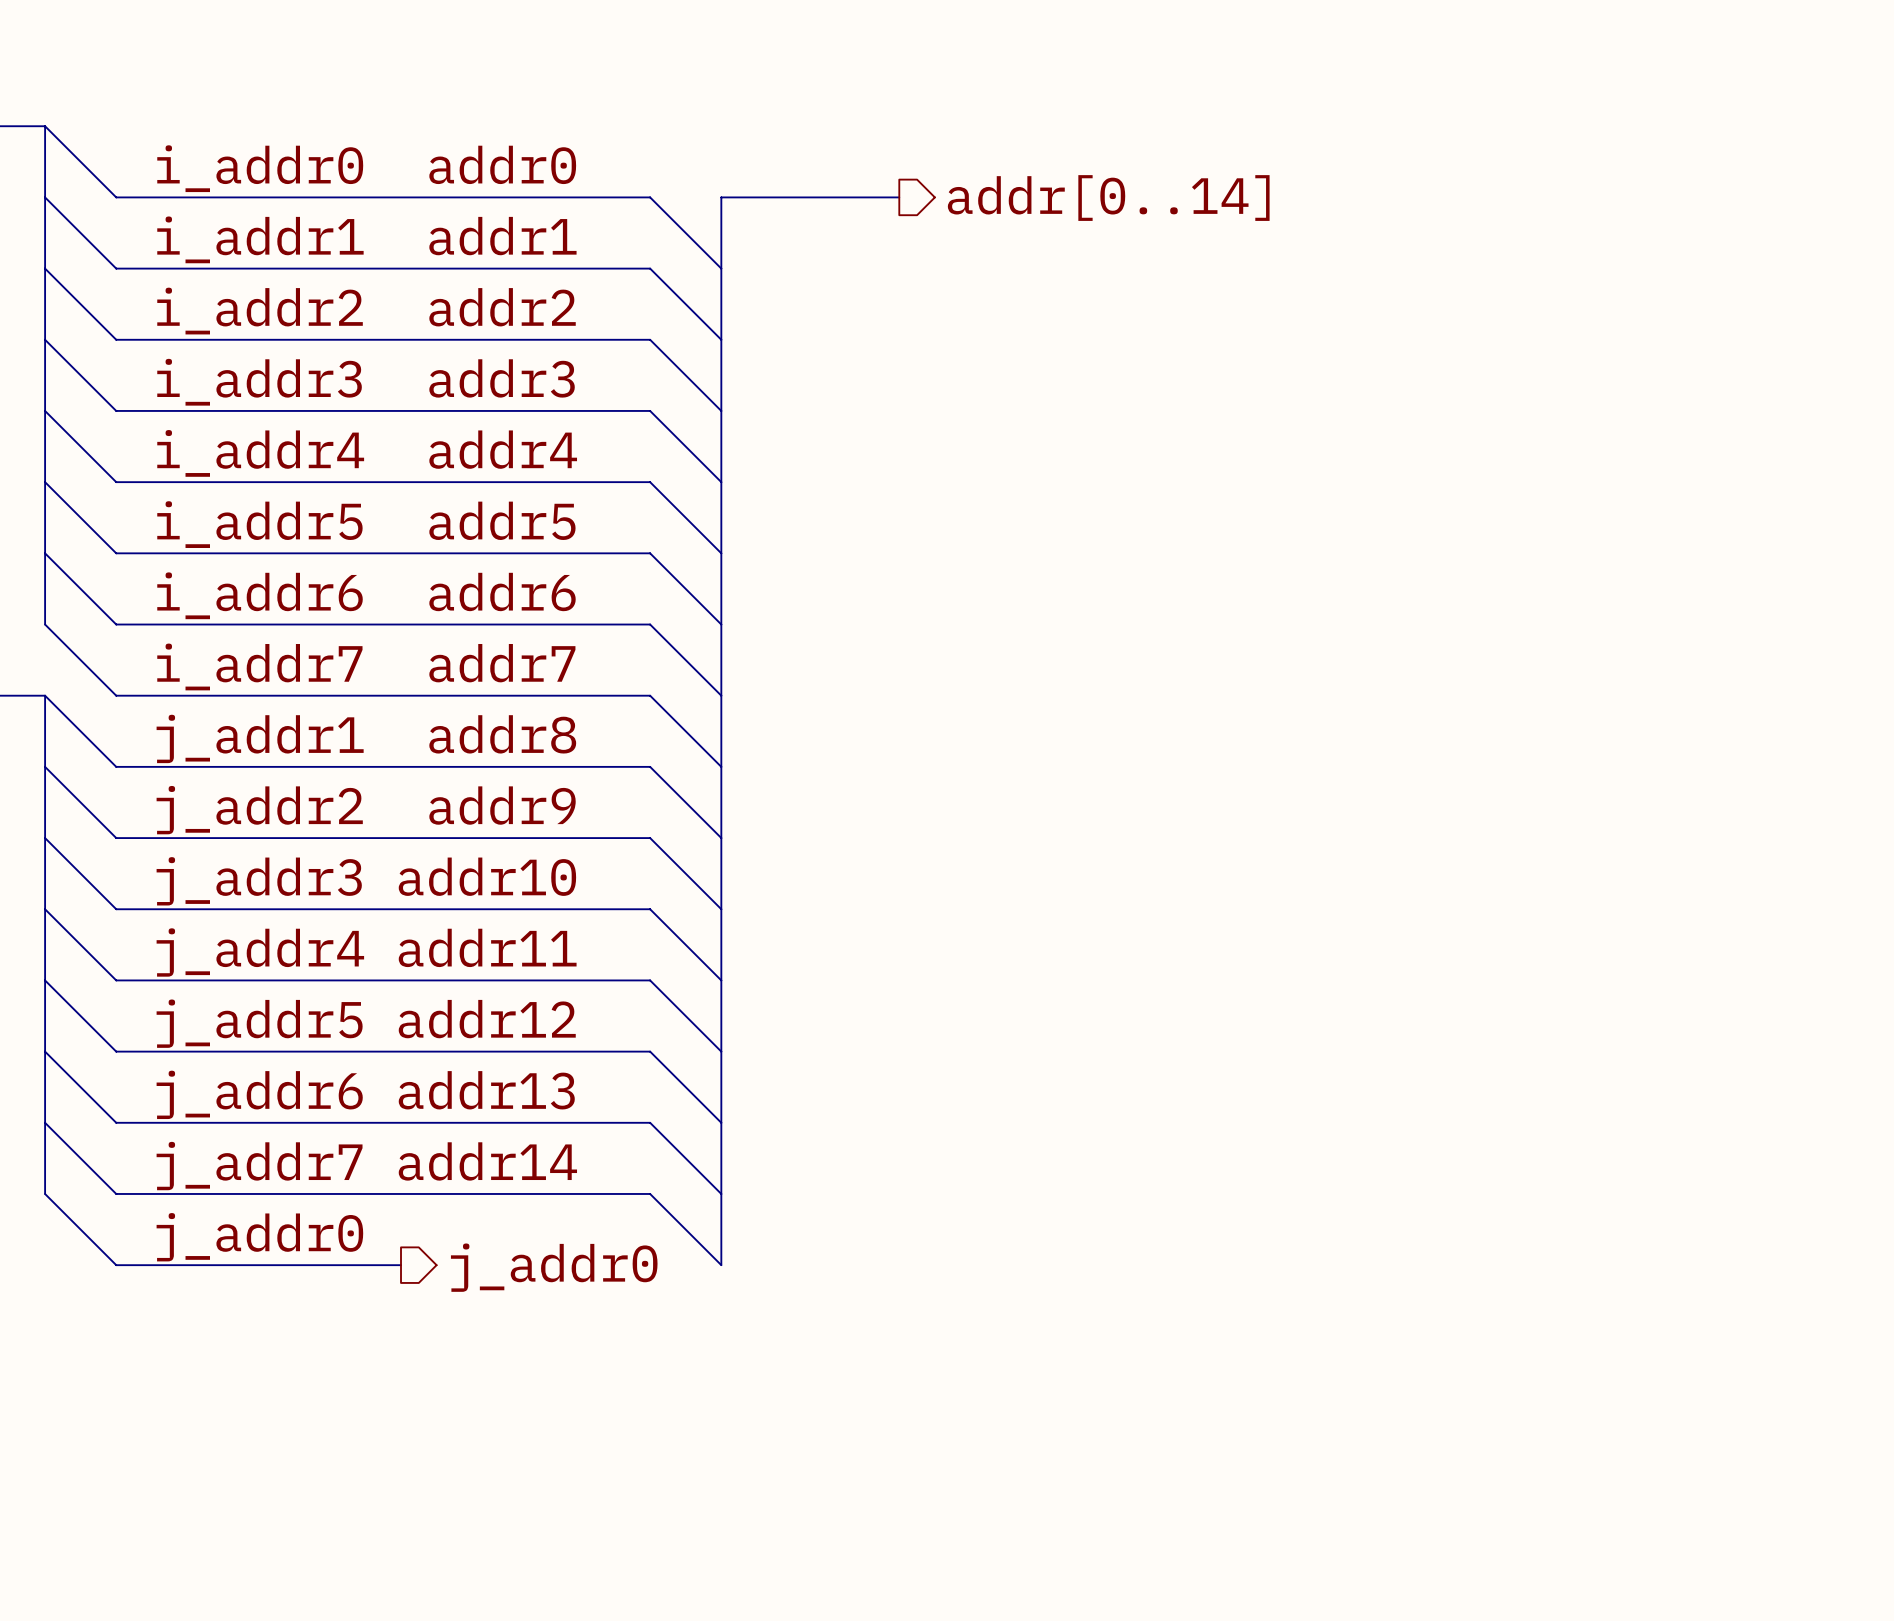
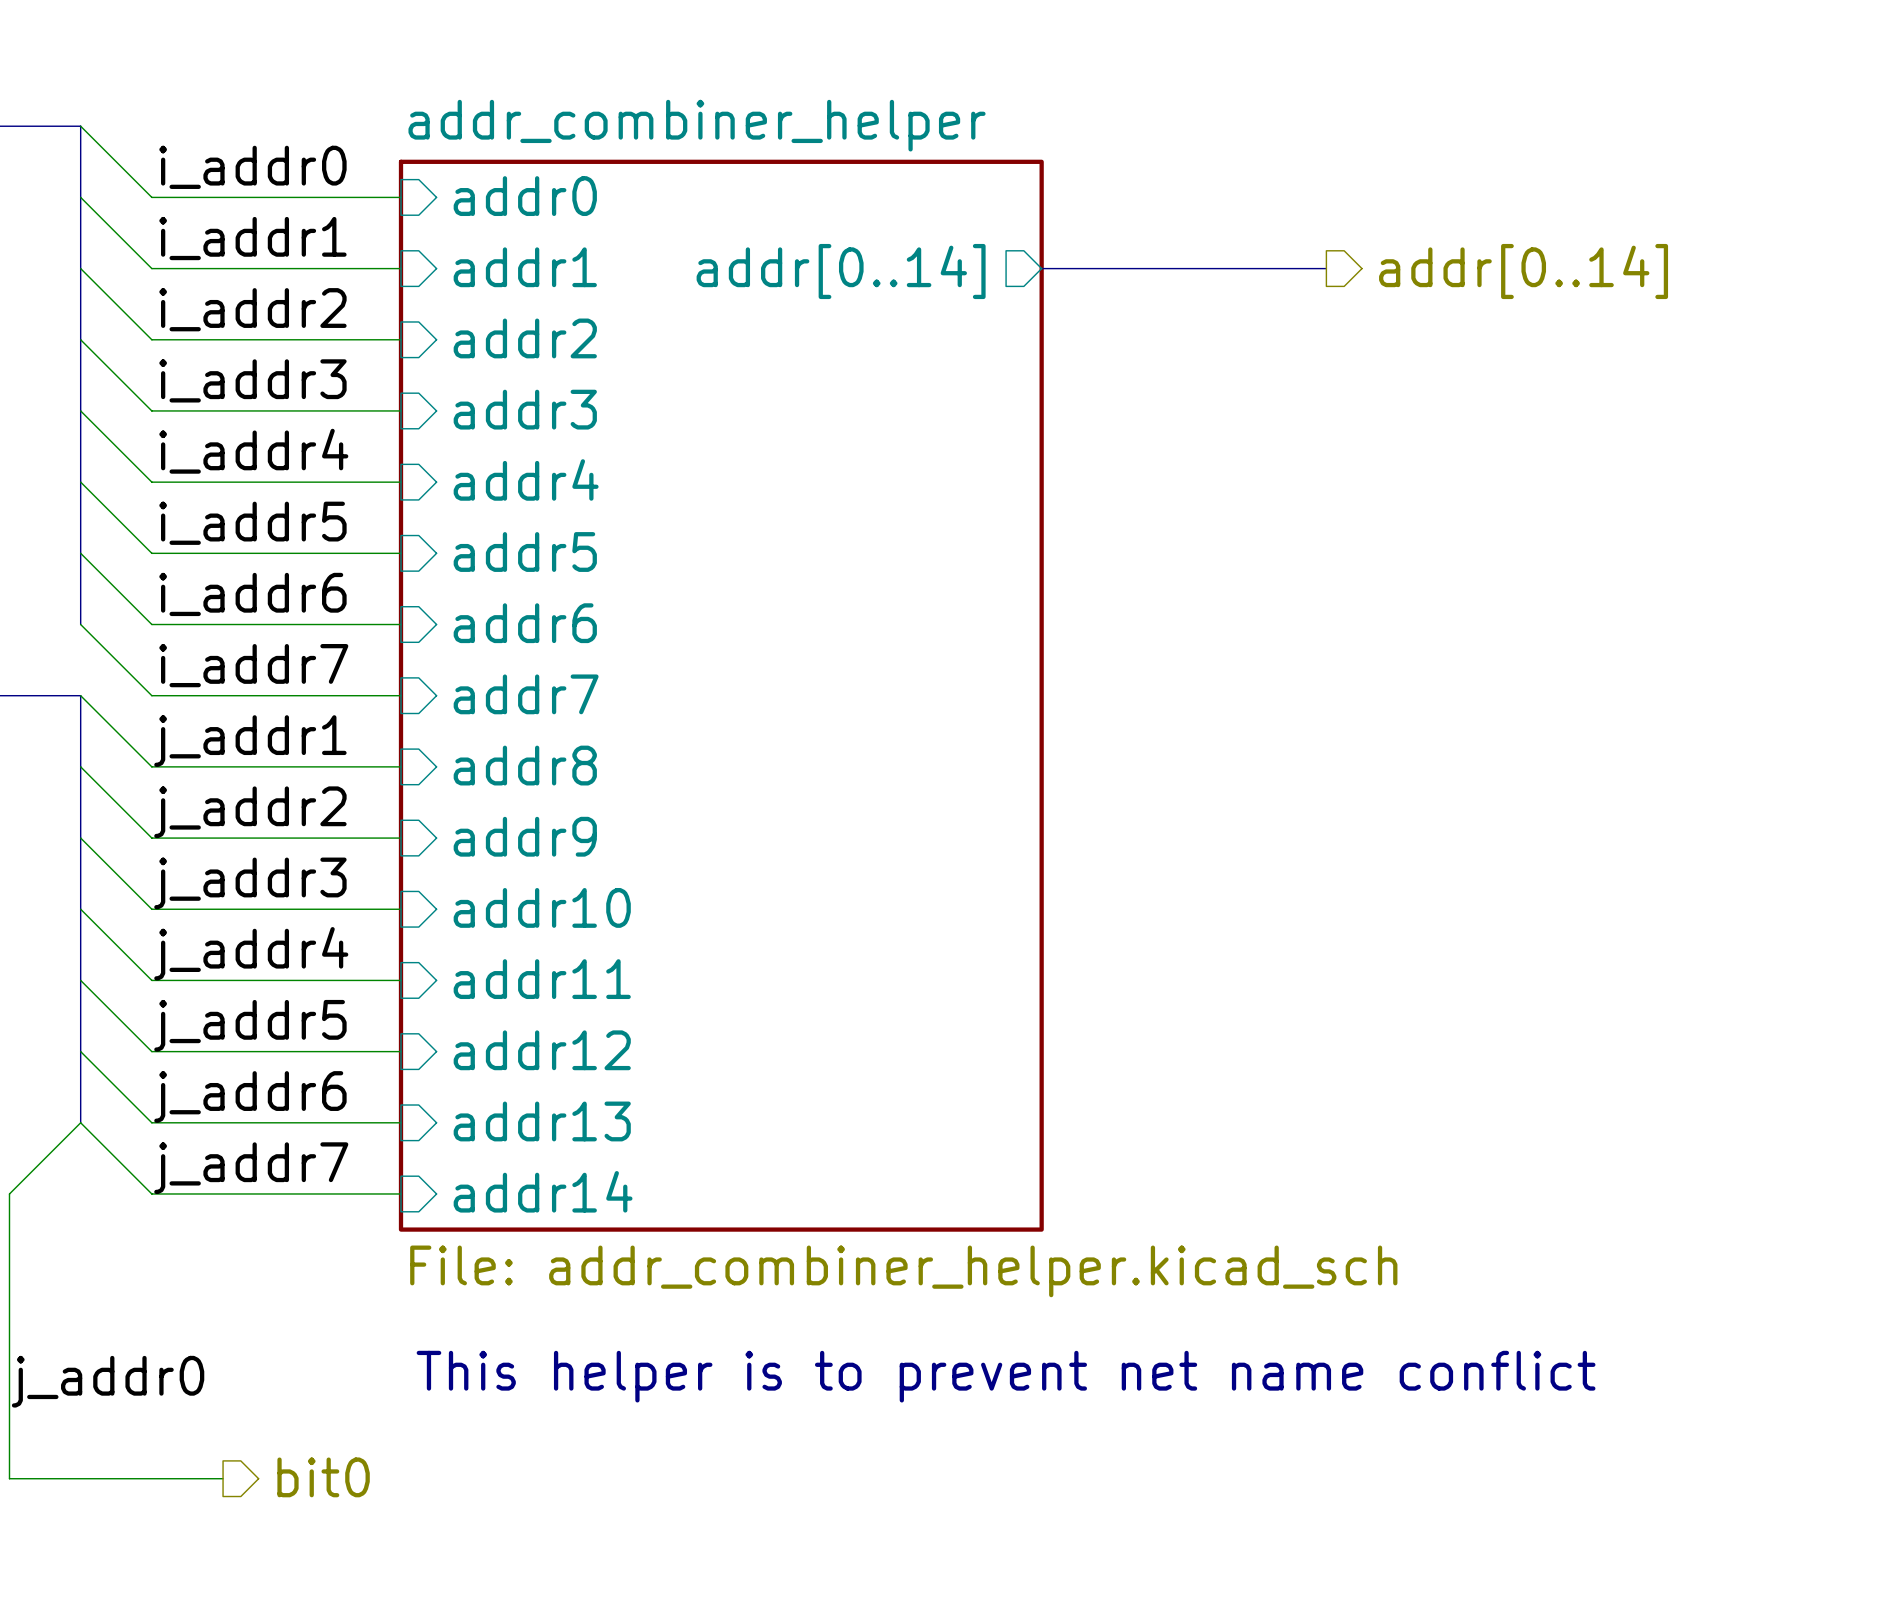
wire: (45, 126) (116, 197) (151, 197) -> (80, 126) (151, 197)
bus: (45, 126) (45, 624) -> (45, 126) (80, 126) (80, 624)
label: addr0 (502, 164) -> none
sheet pin: none -> addr0 (525, 196)
wire: (45, 197) (116, 268) (151, 268) -> (80, 197) (151, 268)
wire: (401, 197) (650, 197) (721, 268) -> none
bus: (899, 197) (721, 197) (721, 1265) -> none
hierarchical label position: addr[0..14] (1108, 198) -> addr[0..14] (1523, 271)
label: addr1 (502, 236) -> none
sheet pin: none -> addr1 (525, 267)
wire: (45, 268) (116, 339) (151, 339) -> (80, 268) (151, 339)
wire: (401, 268) (650, 268) (721, 339) -> none
bus: none -> (1041, 268) (1326, 268)
sheet pin: none -> addr[0..14] (841, 271)
label: addr2 (502, 307) -> none
sheet pin: none -> addr2 (525, 338)
wire: (45, 339) (116, 410) (151, 410) -> (80, 339) (151, 410)
wire: (401, 339) (650, 339) (721, 410) -> none
label: addr3 (502, 378) -> none
sheet pin: none -> addr3 (525, 409)
wire: (45, 410) (116, 482) (151, 482) -> (80, 410) (151, 482)
wire: (401, 410) (650, 410) (721, 482) -> none
label: addr4 (503, 449) -> none
sheet pin: none -> addr4 (526, 479)
wire: (45, 482) (116, 553) (151, 553) -> (80, 482) (151, 553)
wire: (401, 482) (650, 482) (721, 553) -> none
label: addr5 (502, 520) -> none
sheet pin: none -> addr5 (525, 552)
wire: (45, 553) (116, 624) (151, 624) -> (80, 553) (151, 624)
wire: (401, 553) (650, 553) (721, 624) -> none
label: addr6 (502, 591) -> none
sheet pin: none -> addr6 (525, 623)
wire: (45, 624) (116, 695) (151, 695) -> (80, 624) (151, 695)
wire: (401, 624) (650, 624) (721, 695) -> none
label: addr7 (502, 663) -> none
sheet pin: none -> addr7 (526, 694)
wire: (45, 695) (116, 766) (151, 766) -> (80, 695) (151, 766)
bus: (45, 695) (45, 1193) -> (45, 695) (80, 695) (80, 1122)
wire: (401, 695) (650, 695) (721, 766) -> none
sheet addr_combiner_helper: none -> File: addr_combiner_helper.kicad_sch (721, 695)
label: addr8 (502, 734) -> none
sheet pin: none -> addr8 (525, 765)
wire: (45, 766) (116, 838) (151, 838) -> (80, 766) (151, 838)
wire: (401, 766) (650, 766) (721, 838) -> none
label: addr9 (502, 805) -> none
sheet pin: none -> addr9 (525, 836)
wire: (45, 838) (116, 909) (151, 909) -> (80, 838) (151, 909)
wire: (401, 838) (650, 838) (721, 909) -> none
label: addr10 (487, 876) -> none
sheet pin: none -> addr10 (542, 907)
wire: (45, 909) (116, 980) (151, 980) -> (80, 909) (151, 980)
wire: (401, 909) (650, 909) (721, 980) -> none
label: addr11 (487, 947) -> none
sheet pin: none -> addr11 (542, 979)
wire: (45, 980) (116, 1051) (151, 1051) -> (80, 980) (151, 1051)
wire: (401, 980) (650, 980) (721, 1051) -> none
label: addr12 (487, 1019) -> none
sheet pin: none -> addr12 (542, 1050)
wire: (45, 1051) (116, 1122) (151, 1122) -> (80, 1051) (151, 1122)
wire: (401, 1051) (650, 1051) (721, 1122) -> none
label: addr13 (486, 1090) -> none
sheet pin: none -> addr13 (542, 1121)
wire: (45, 1122) (116, 1193) (151, 1193) -> (223, 1478) (9, 1478) (9, 1193) (80, 1122) (151, 1193)
wire: (401, 1122) (650, 1122) (721, 1193) -> none
label: addr14 (487, 1161) -> none
sheet pin: none -> addr14 (543, 1191)
wire: (45, 1193) (116, 1265) (401, 1265) -> none
wire: (401, 1193) (650, 1193) (721, 1265) -> none
label position: j_addr0 (259, 1237) -> j_addr0 (108, 1381)
hierarchical label: j_addr0 (554, 1267) -> none
text: none -> This helper is to prevent net name conflict (1006, 1376)
hierarchical label: none -> bit0 (323, 1477)

